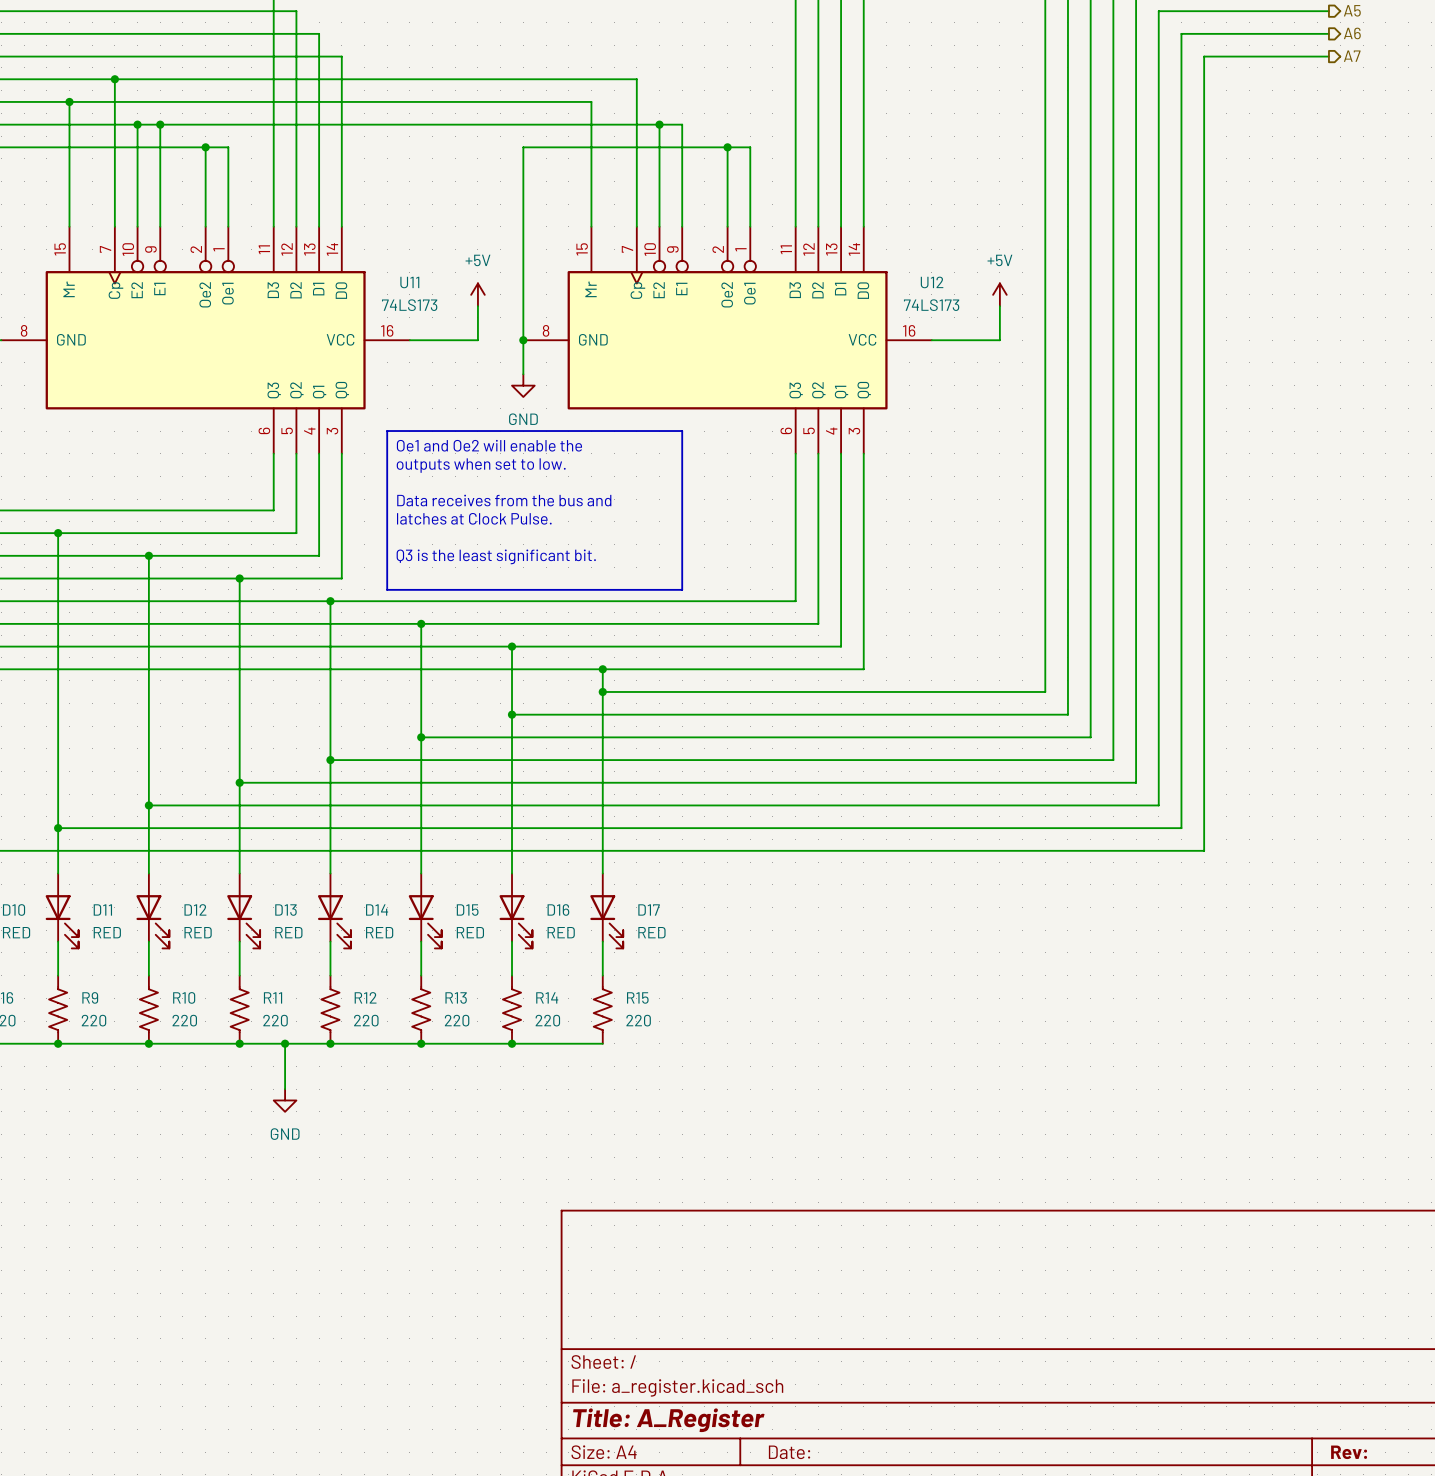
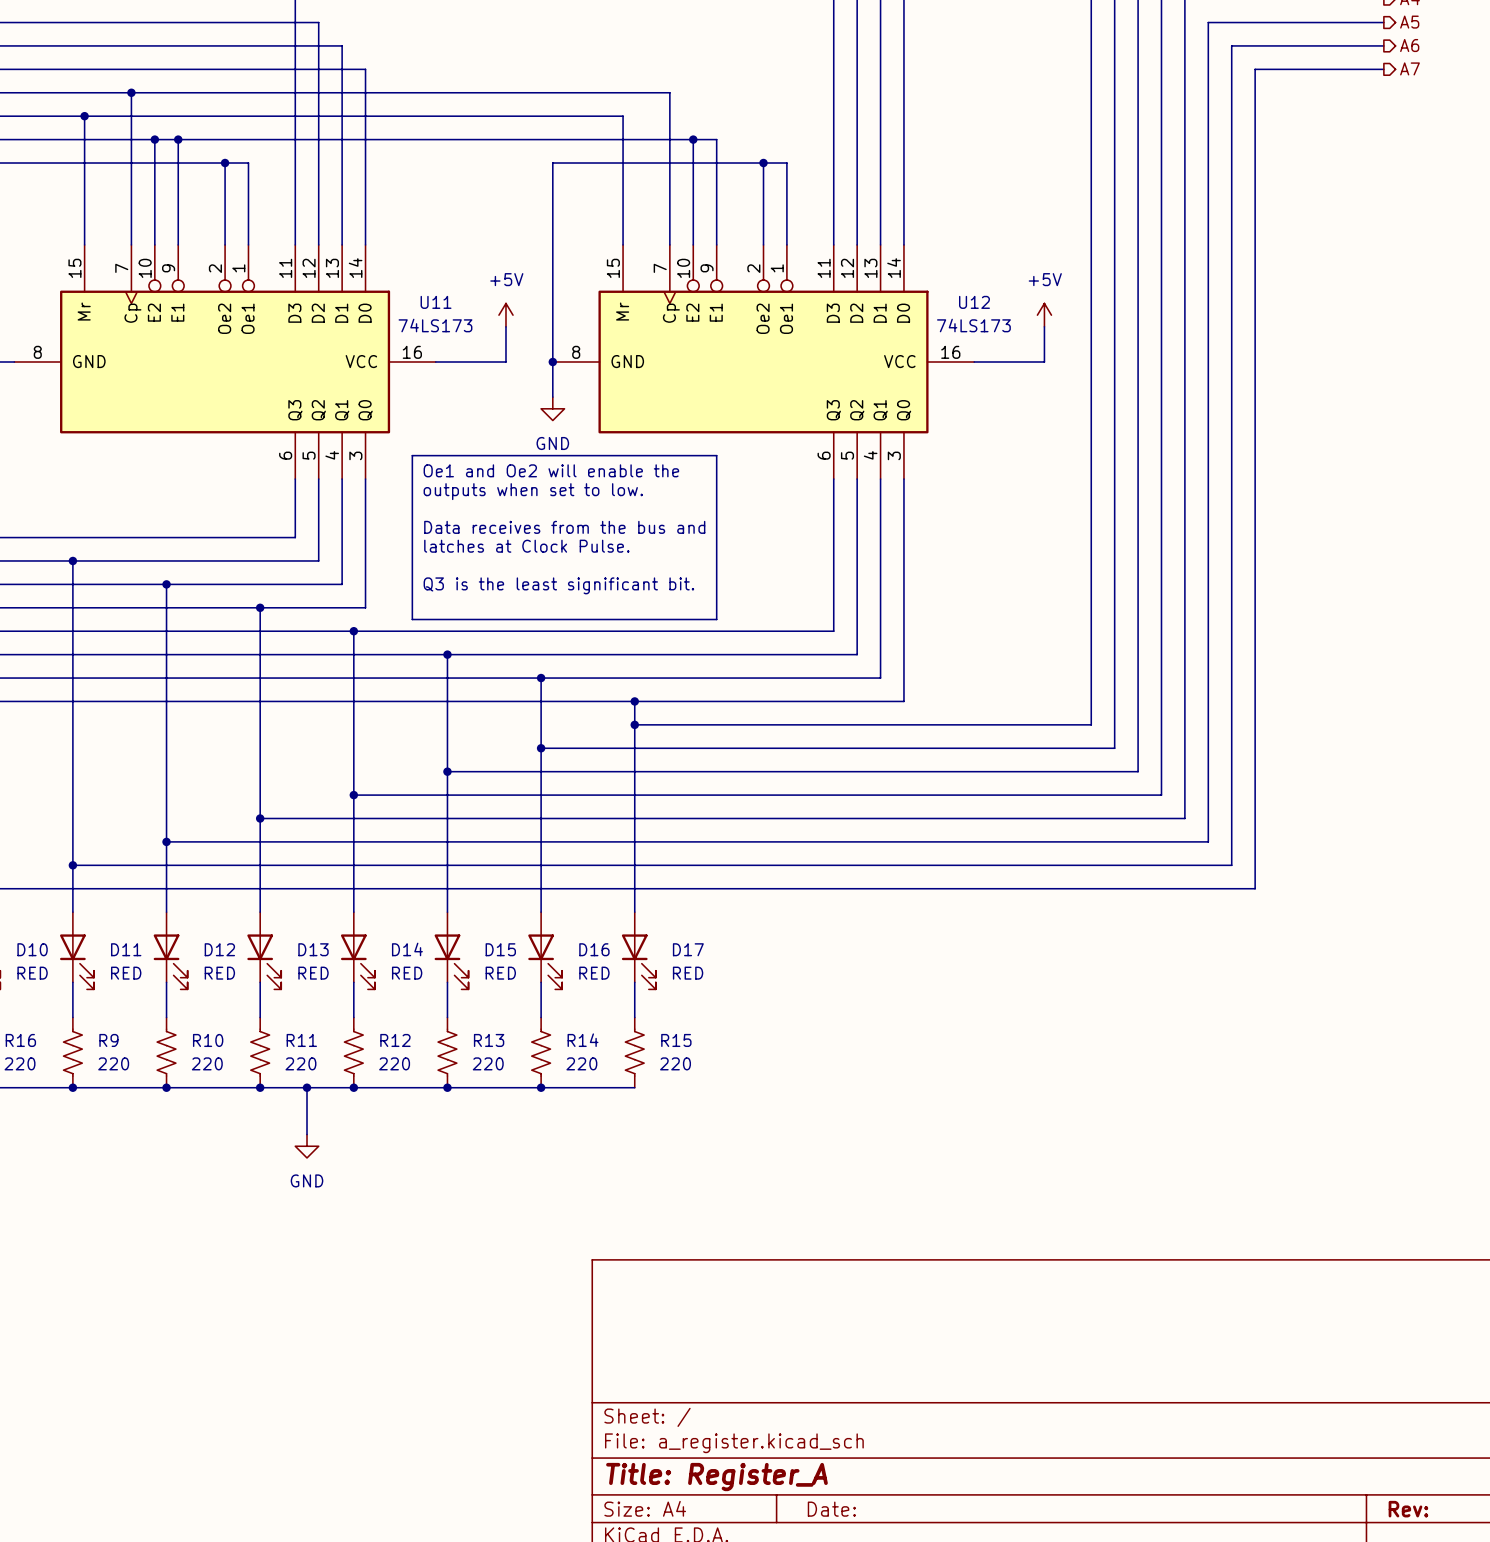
title block: Title: A_Register (668, 1420) -> Title: Register_A (716, 1477)

